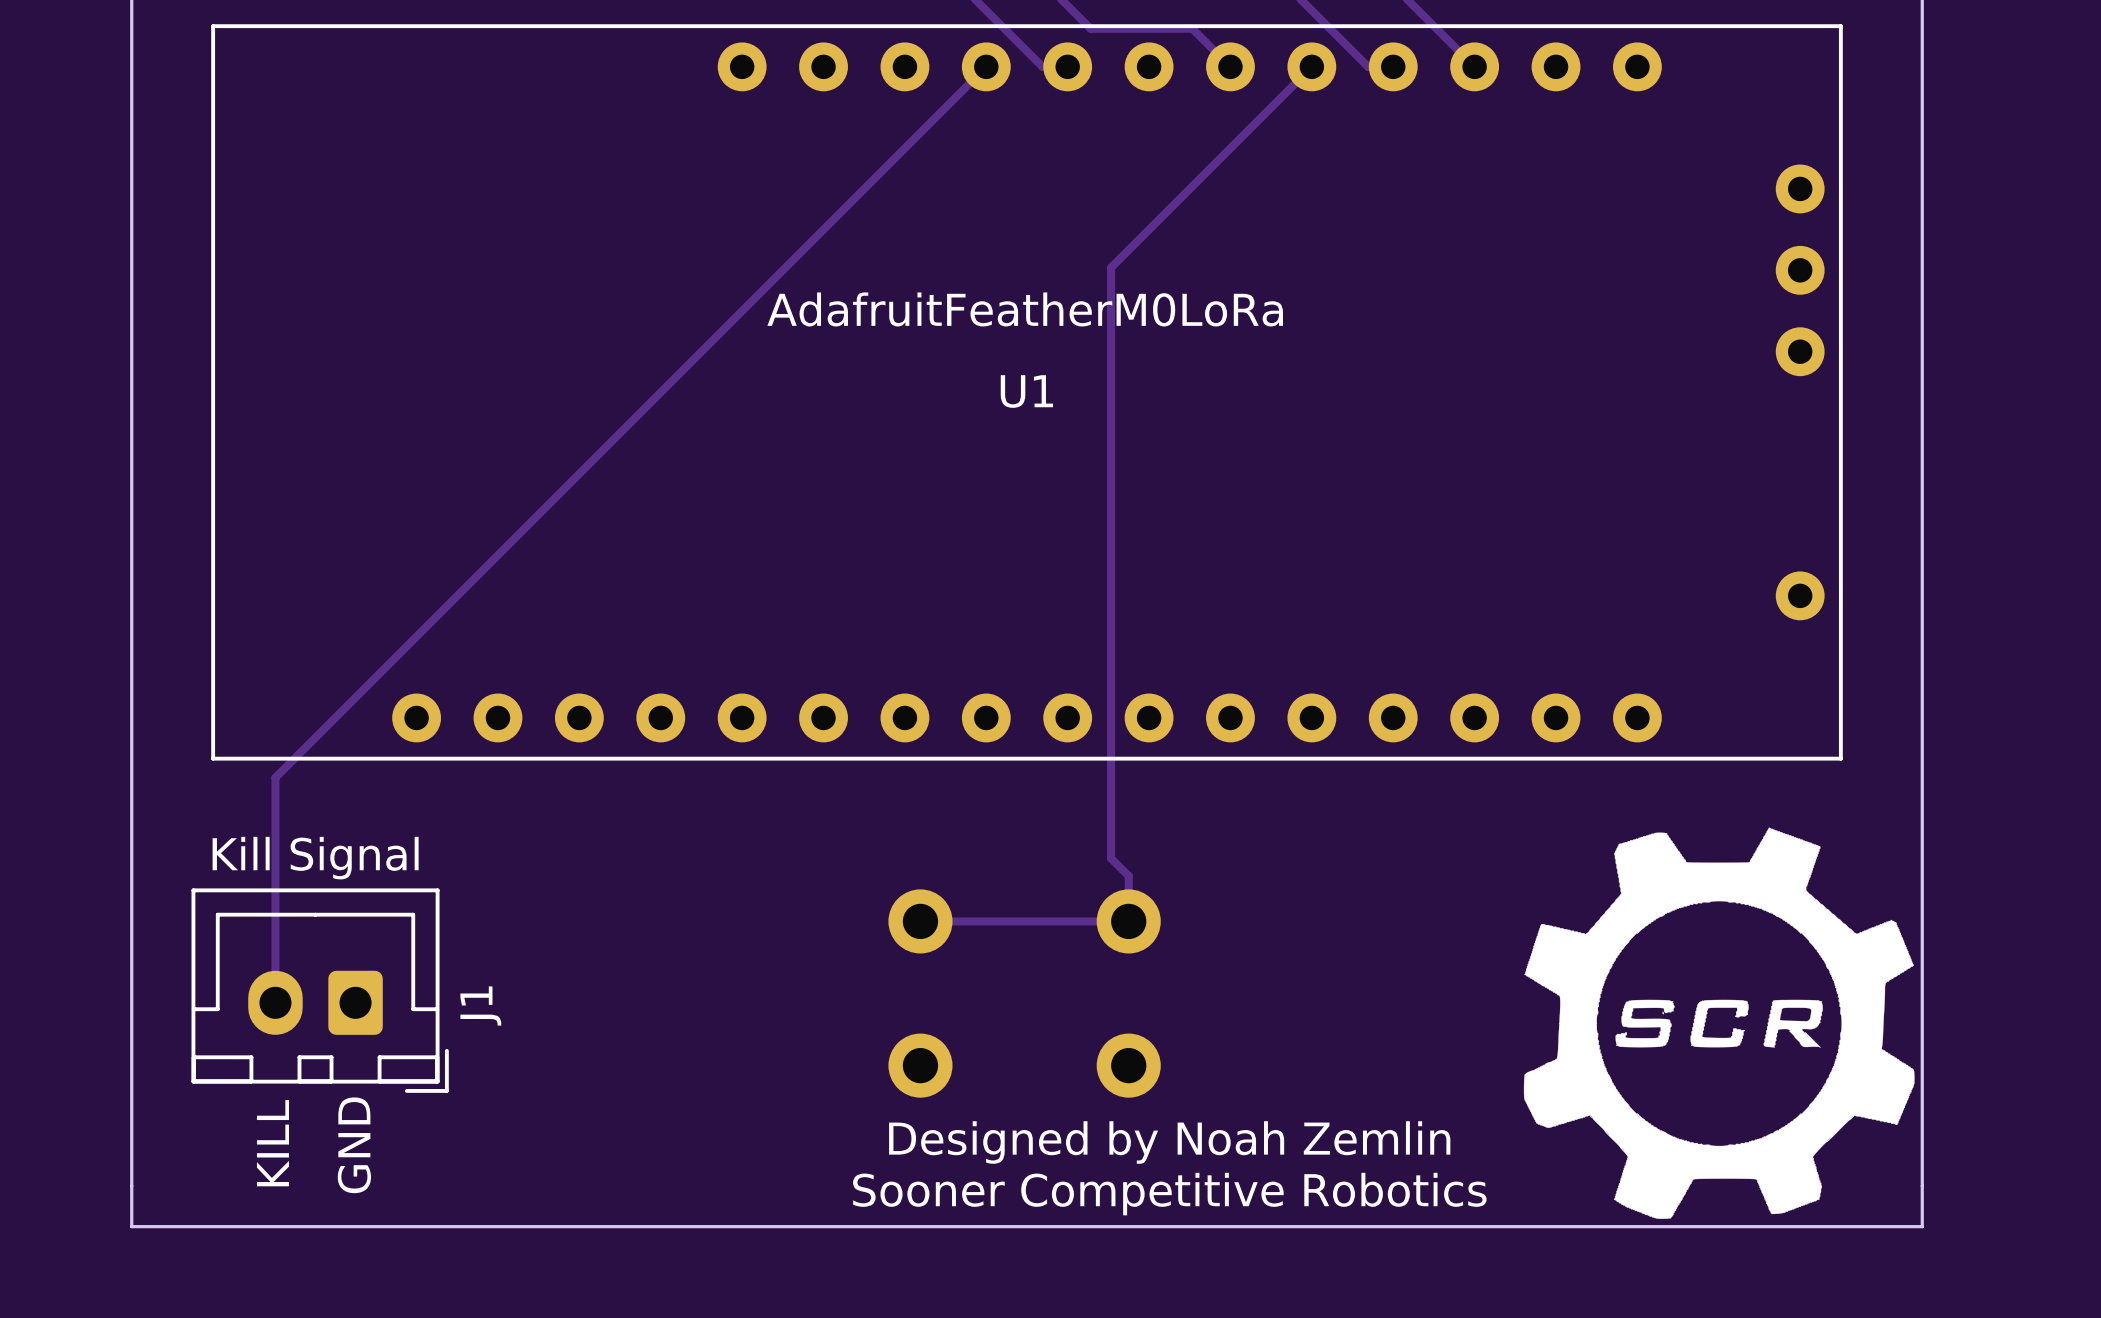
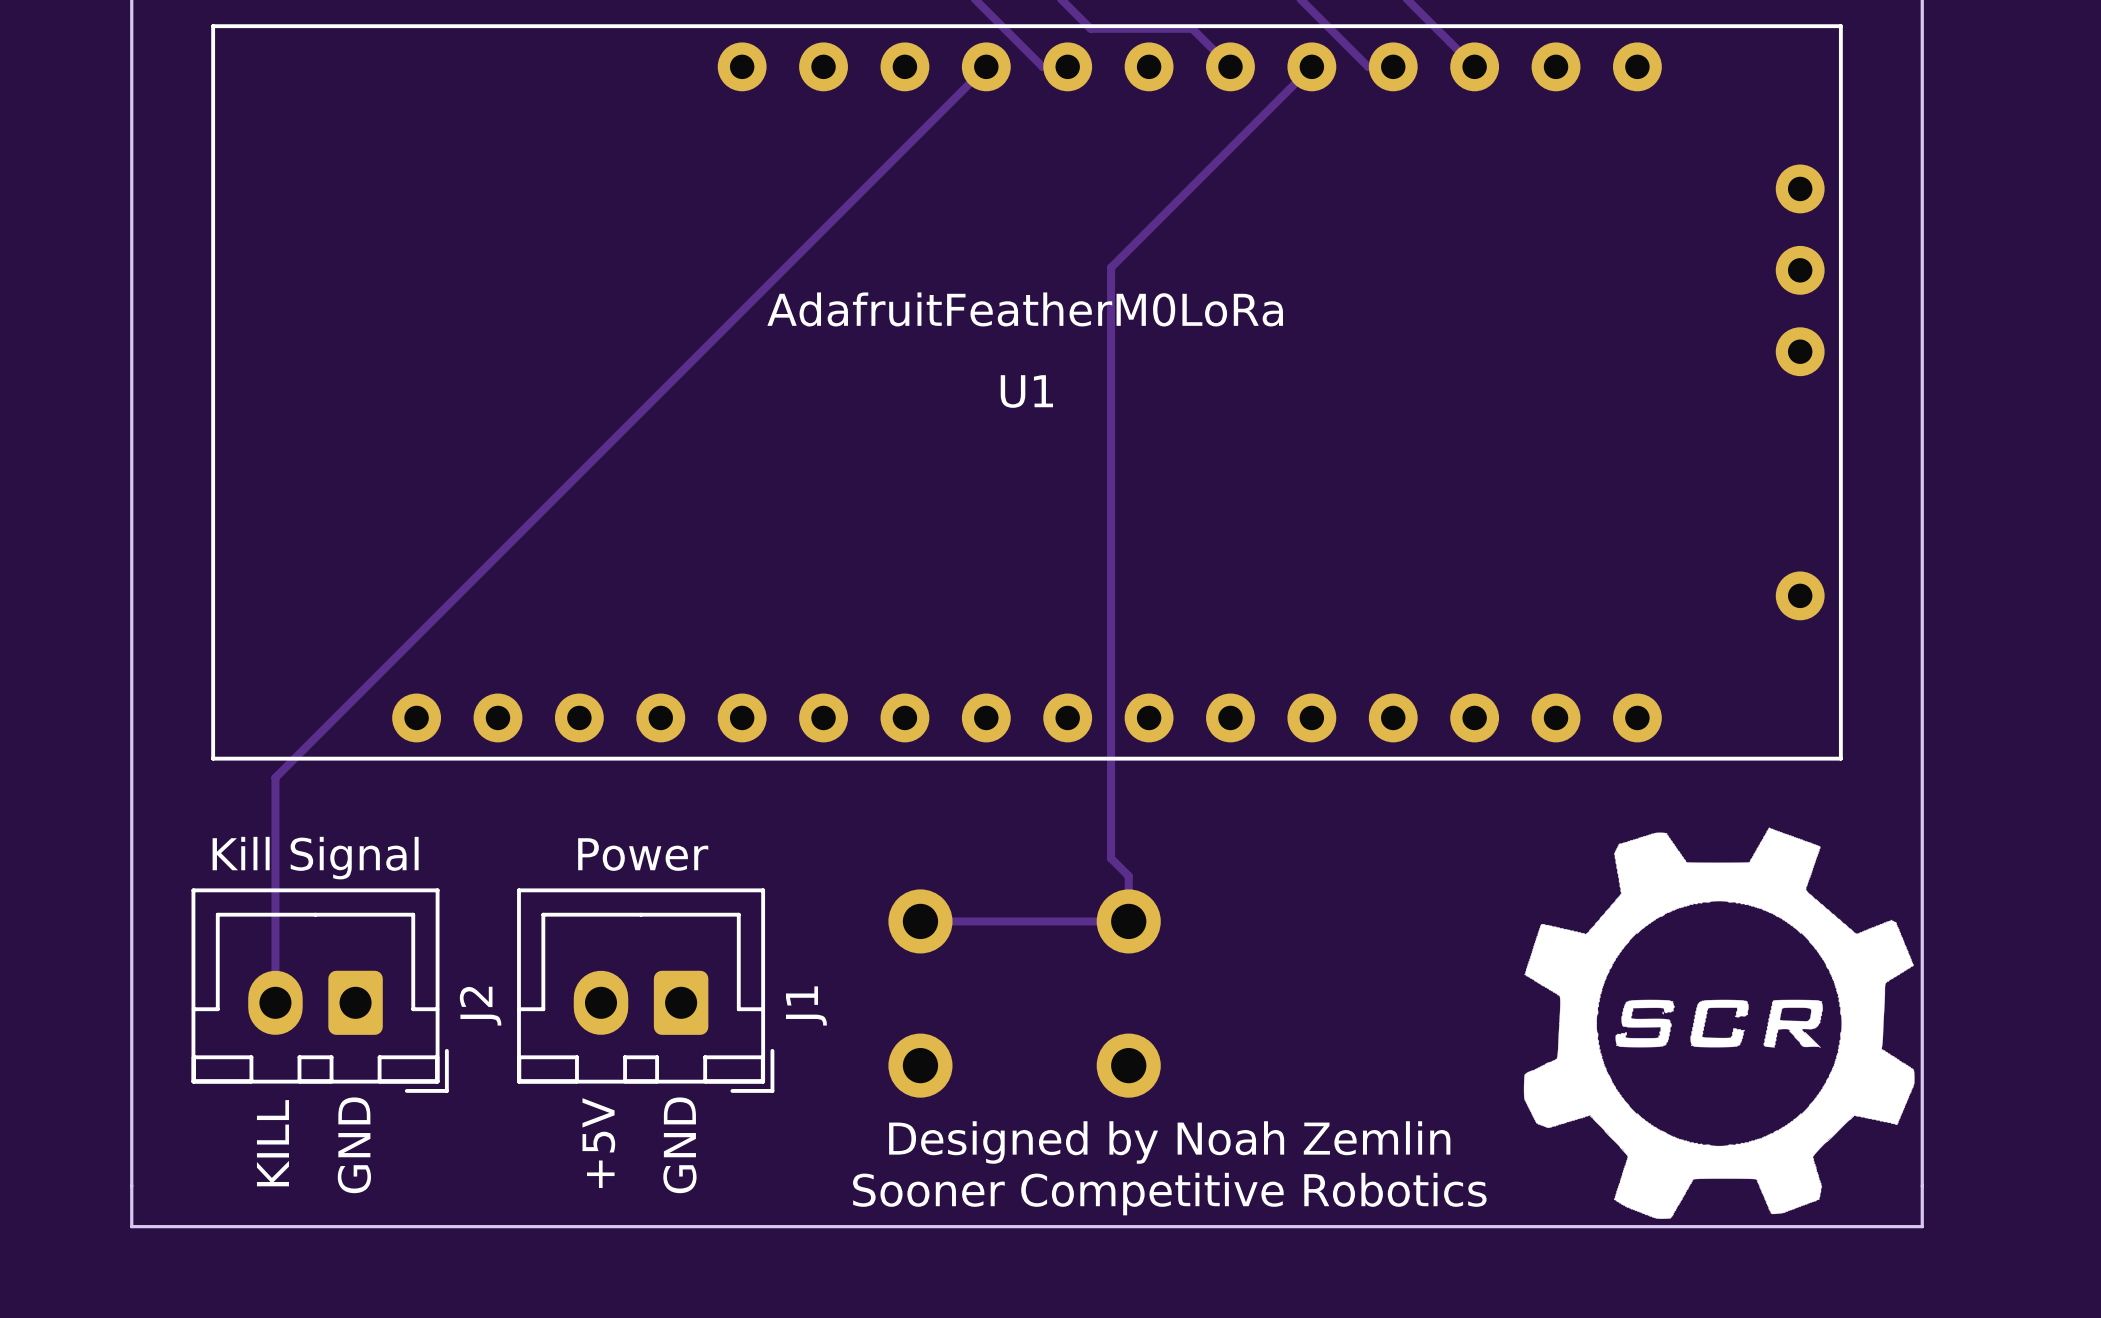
J1: none -> Power (645, 990)
J1 name: J1 (480, 1005) -> J2 (480, 1006)
text: none -> +5V (598, 1143)
text: none -> GND (679, 1145)

